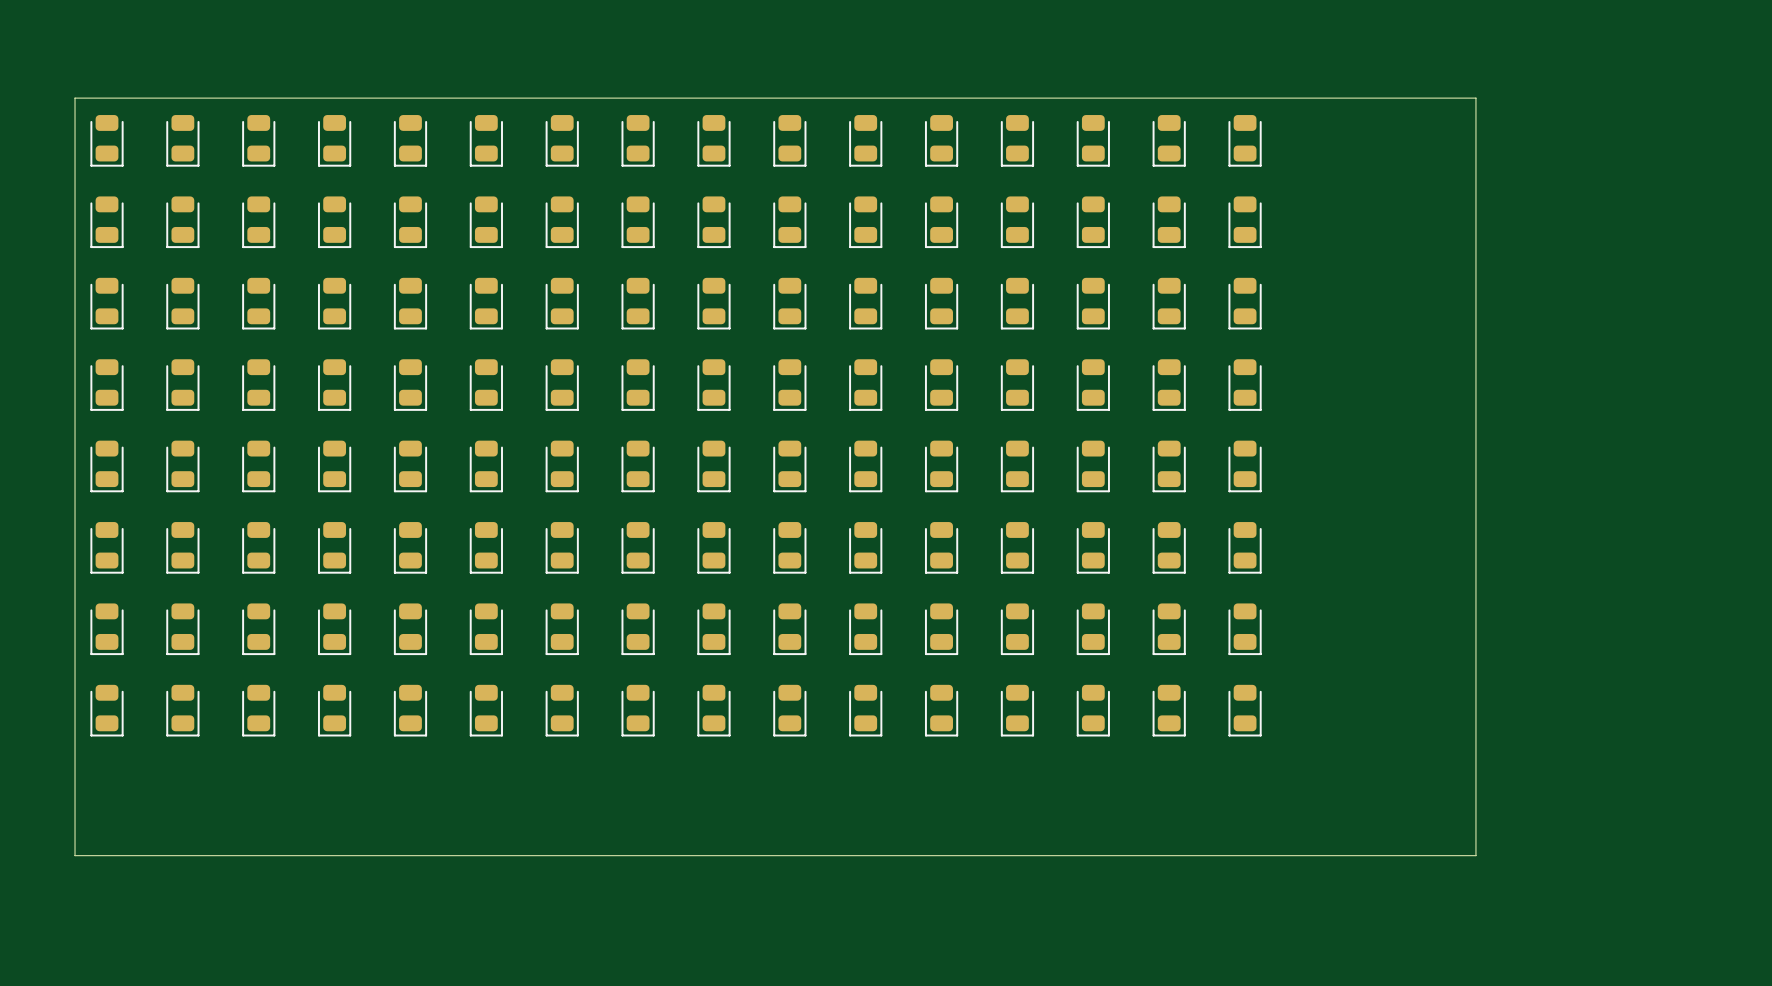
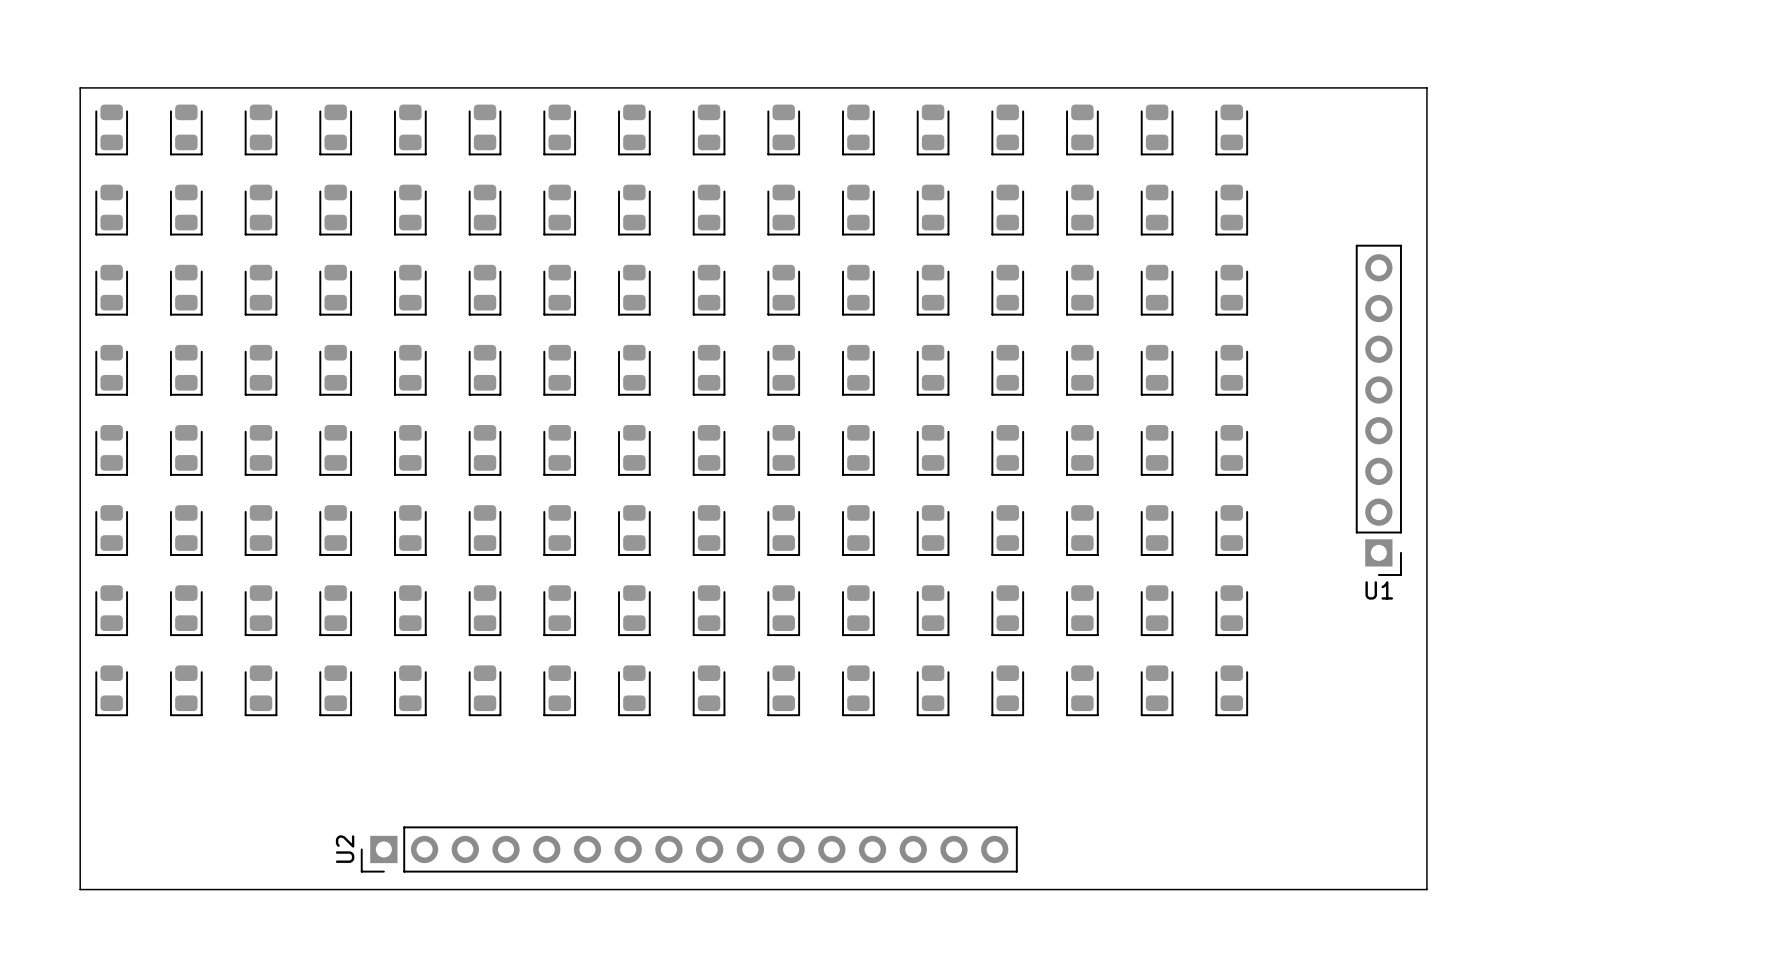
board edge: (1443, 98) (1475, 98) (1475, 855) (75, 855) -> (1426, 87) (1426, 889) (80, 889) (80, 833)
U1: none -> (1378, 410)
U2: none -> (689, 849)

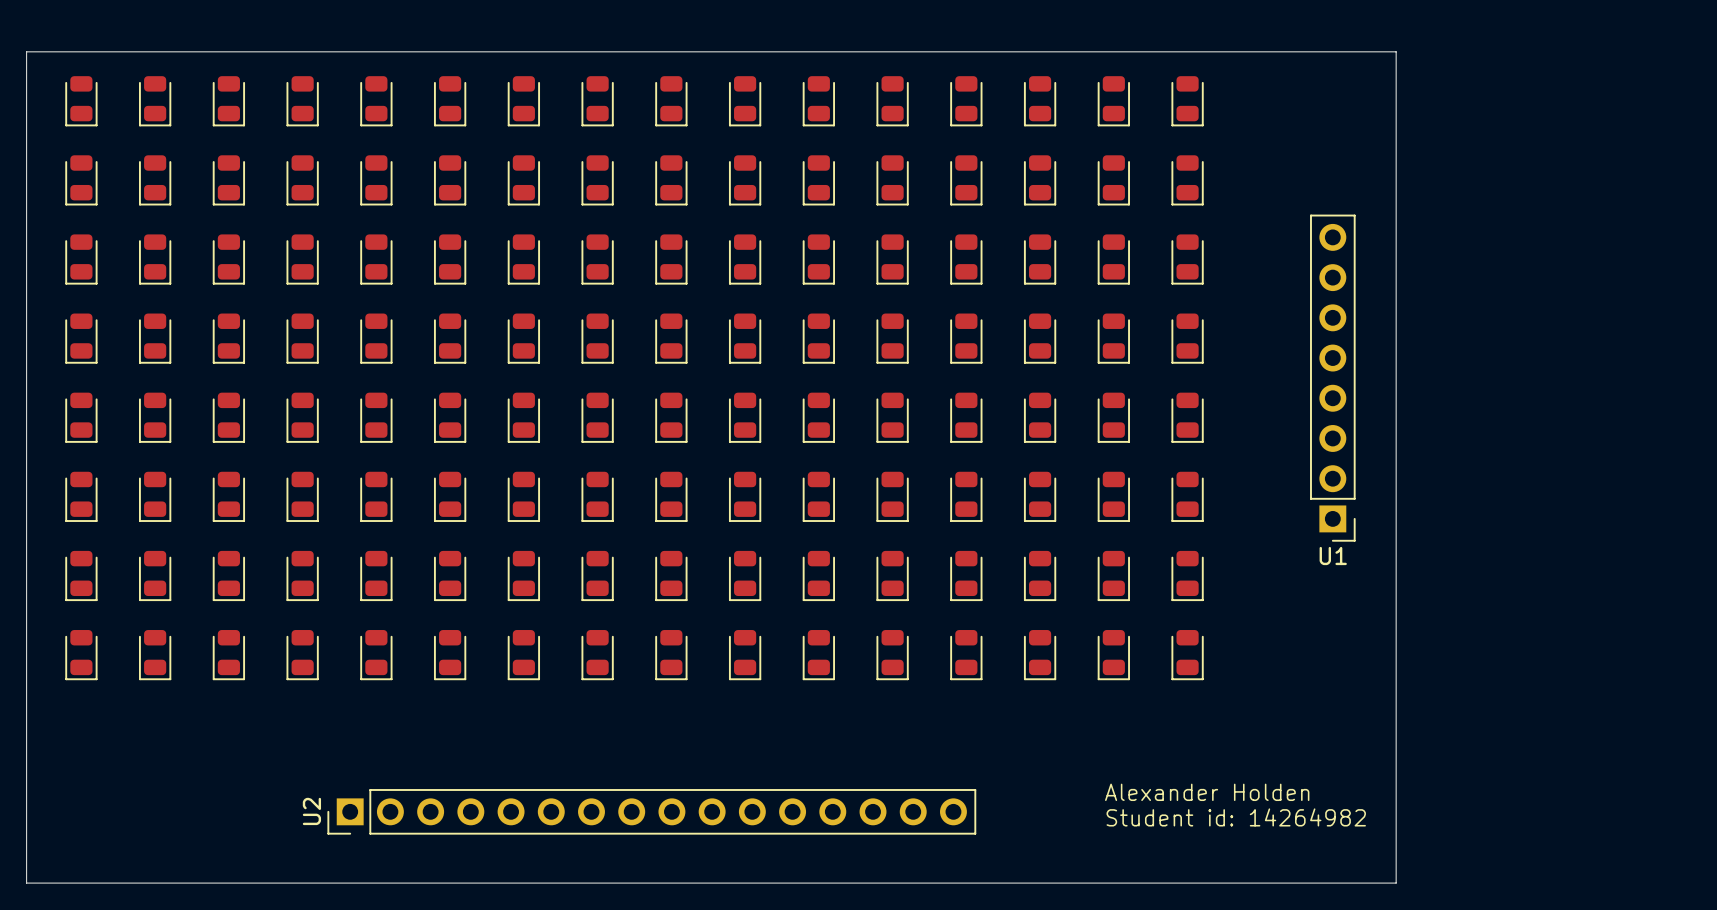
board edge: (80, 87) (1426, 87) (1426, 889) (80, 889) (80, 87) -> (26, 51) (26, 883) (1396, 883) (1396, 51) (26, 51)
text: none -> Alexander Holden (1207, 792)
text: none -> Student id: 14264982 (1236, 817)

